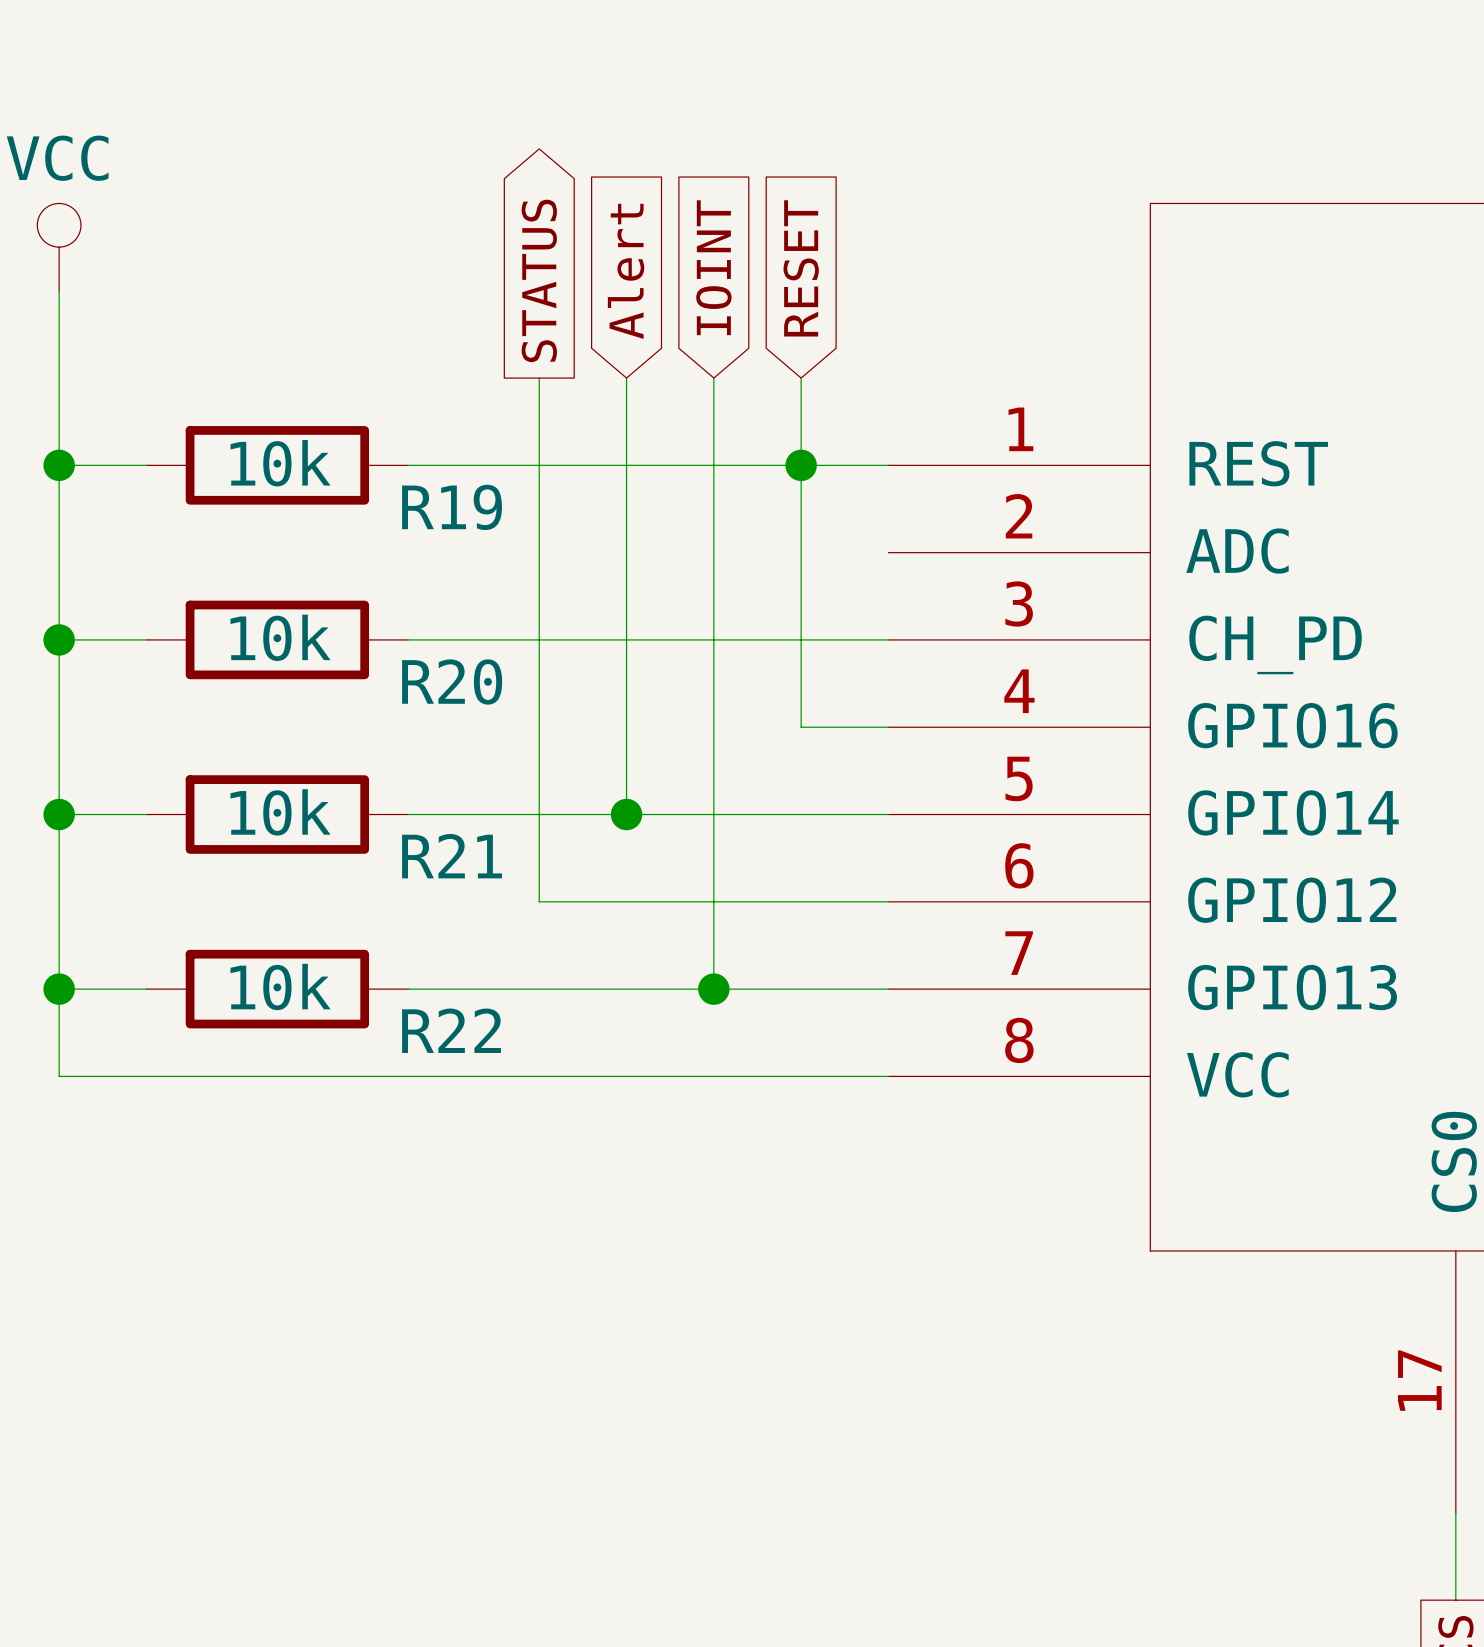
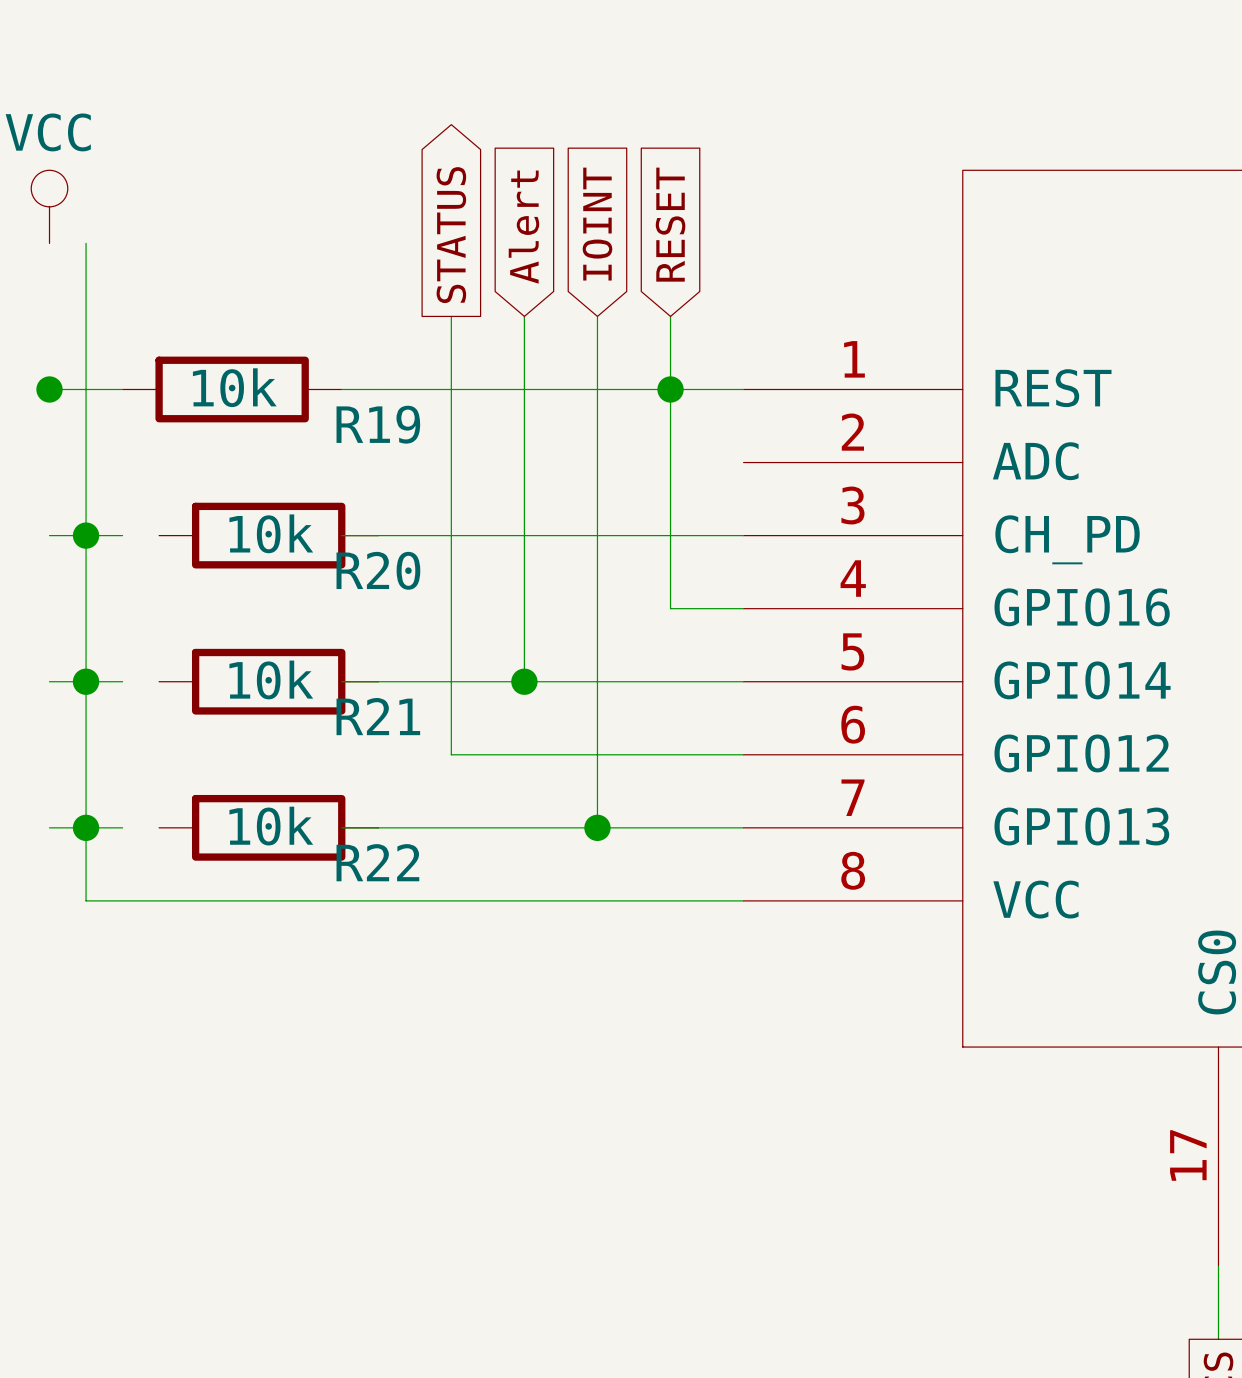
wire: (59, 290) (59, 1076) (102, 1076) -> (86, 243) (86, 900)
junction position: (59, 639) -> (86, 535)
R20 position: (277, 639) -> (268, 535)
junction position: (59, 814) -> (86, 681)
R21 position: (277, 814) -> (268, 681)
junction position: (59, 989) -> (86, 827)
R22 position: (277, 989) -> (268, 827)

